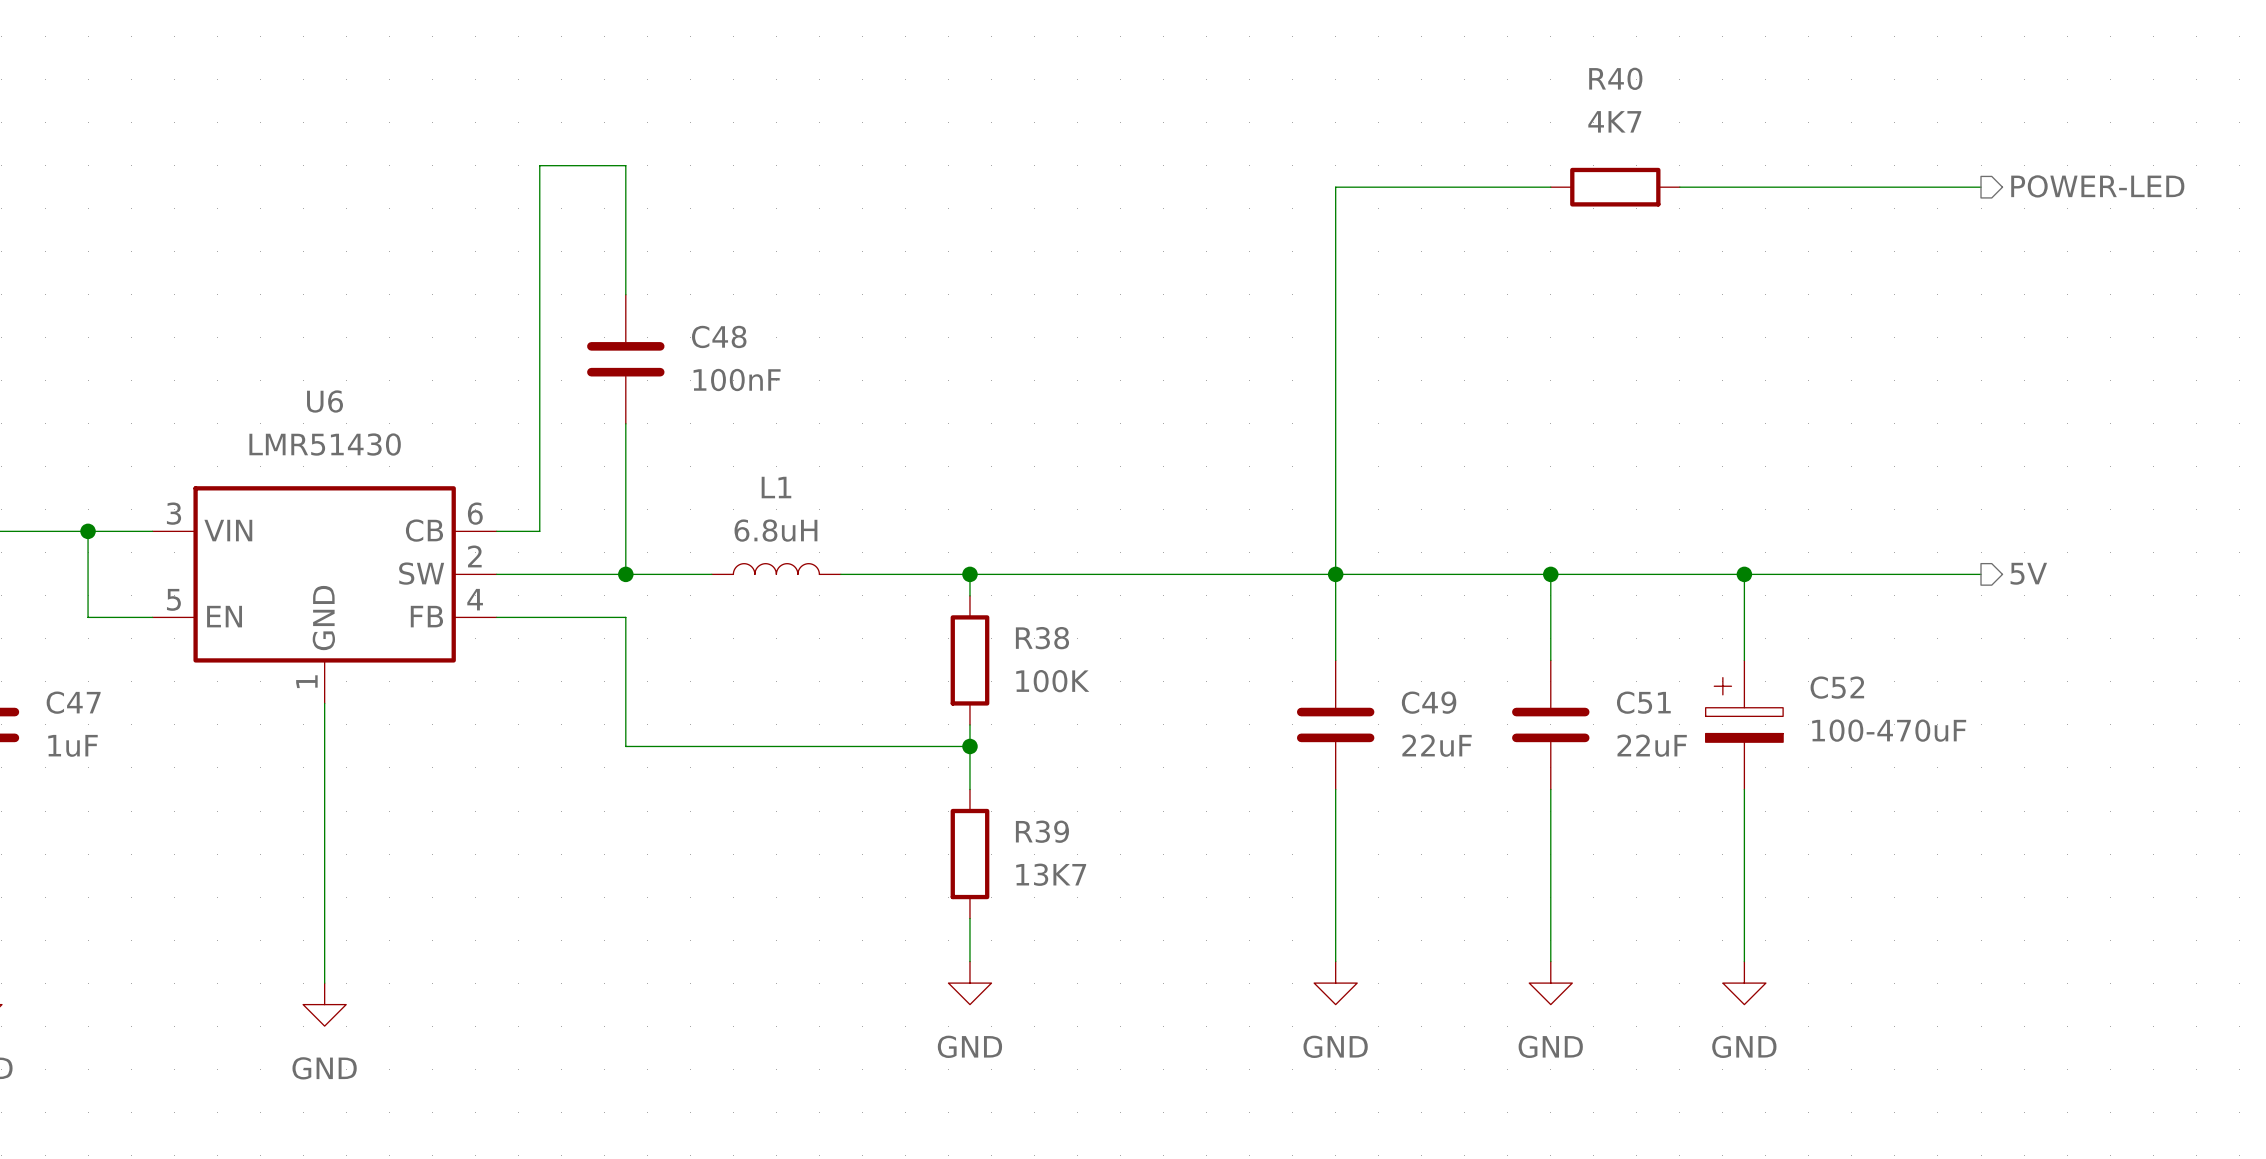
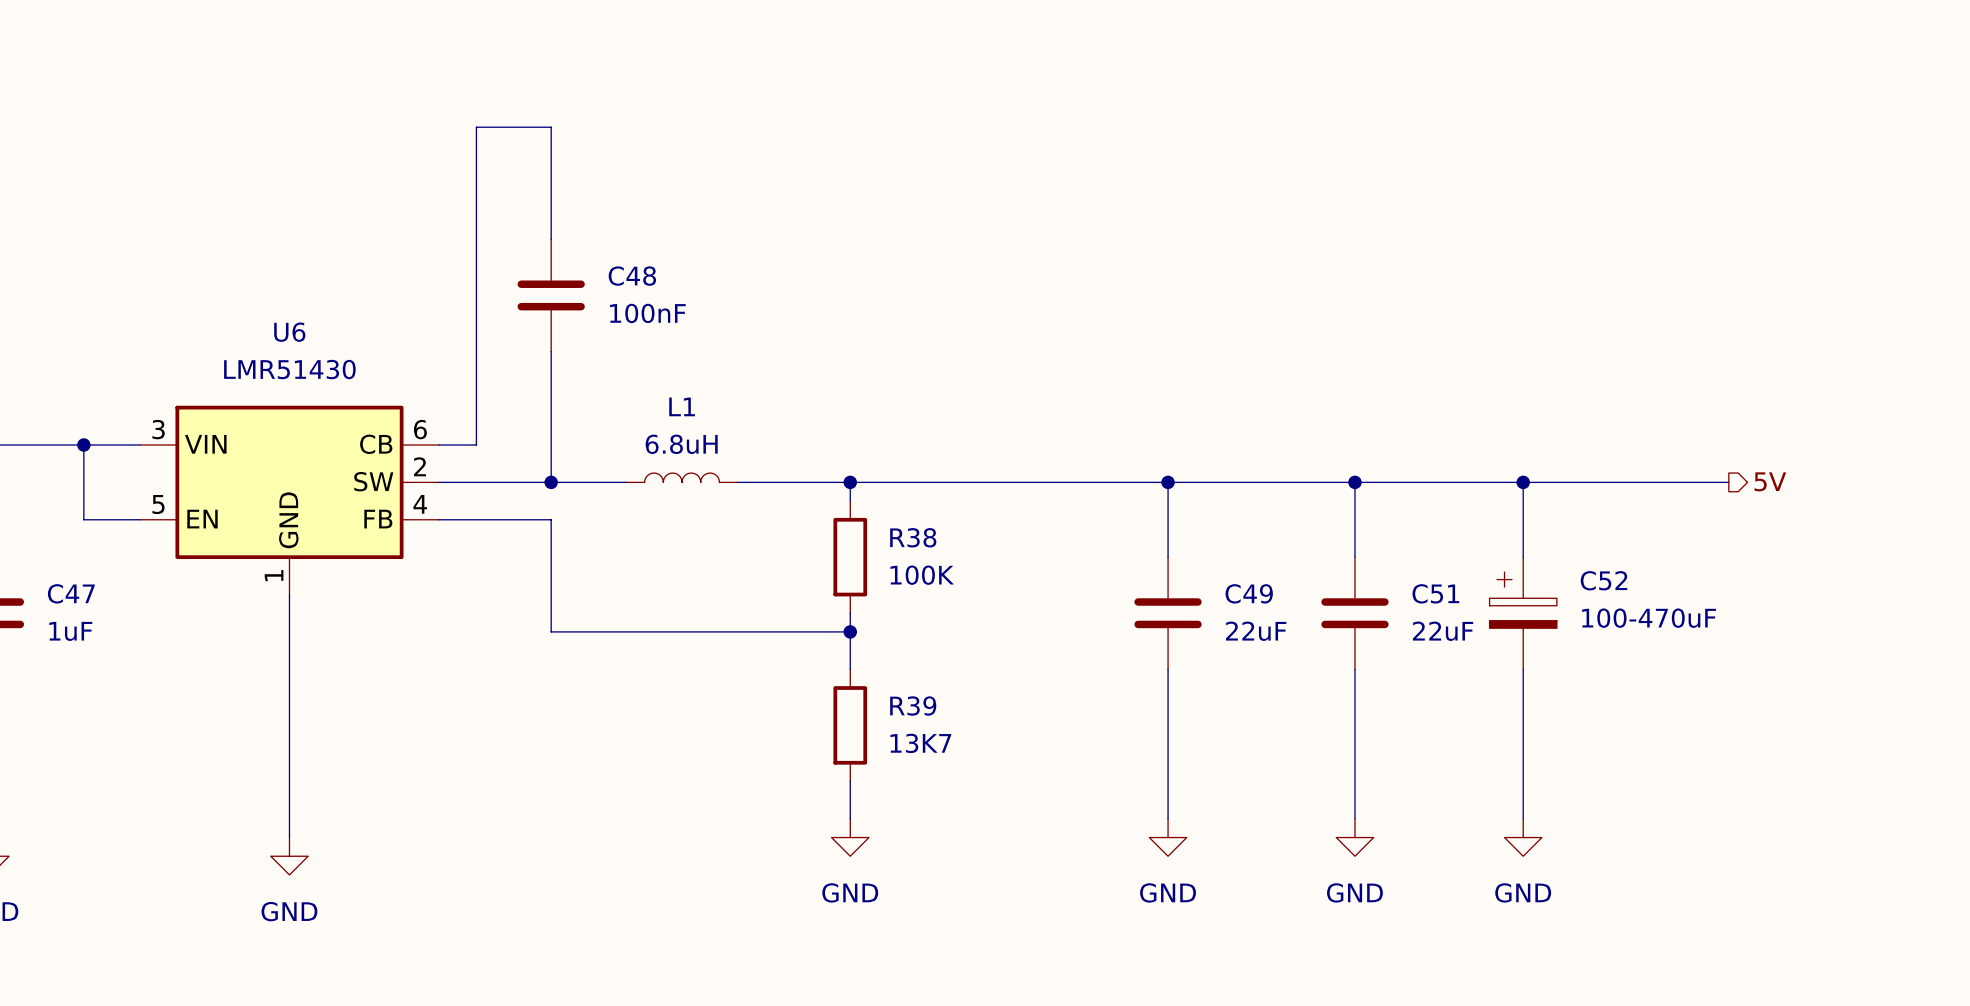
hierarchical label: POWER-LED (2097, 186) -> none
wire: (1550, 187) (1335, 187) (1335, 574) -> none
R40: 4K7 (1615, 187) -> none
wire: (1679, 187) (1981, 187) -> none

